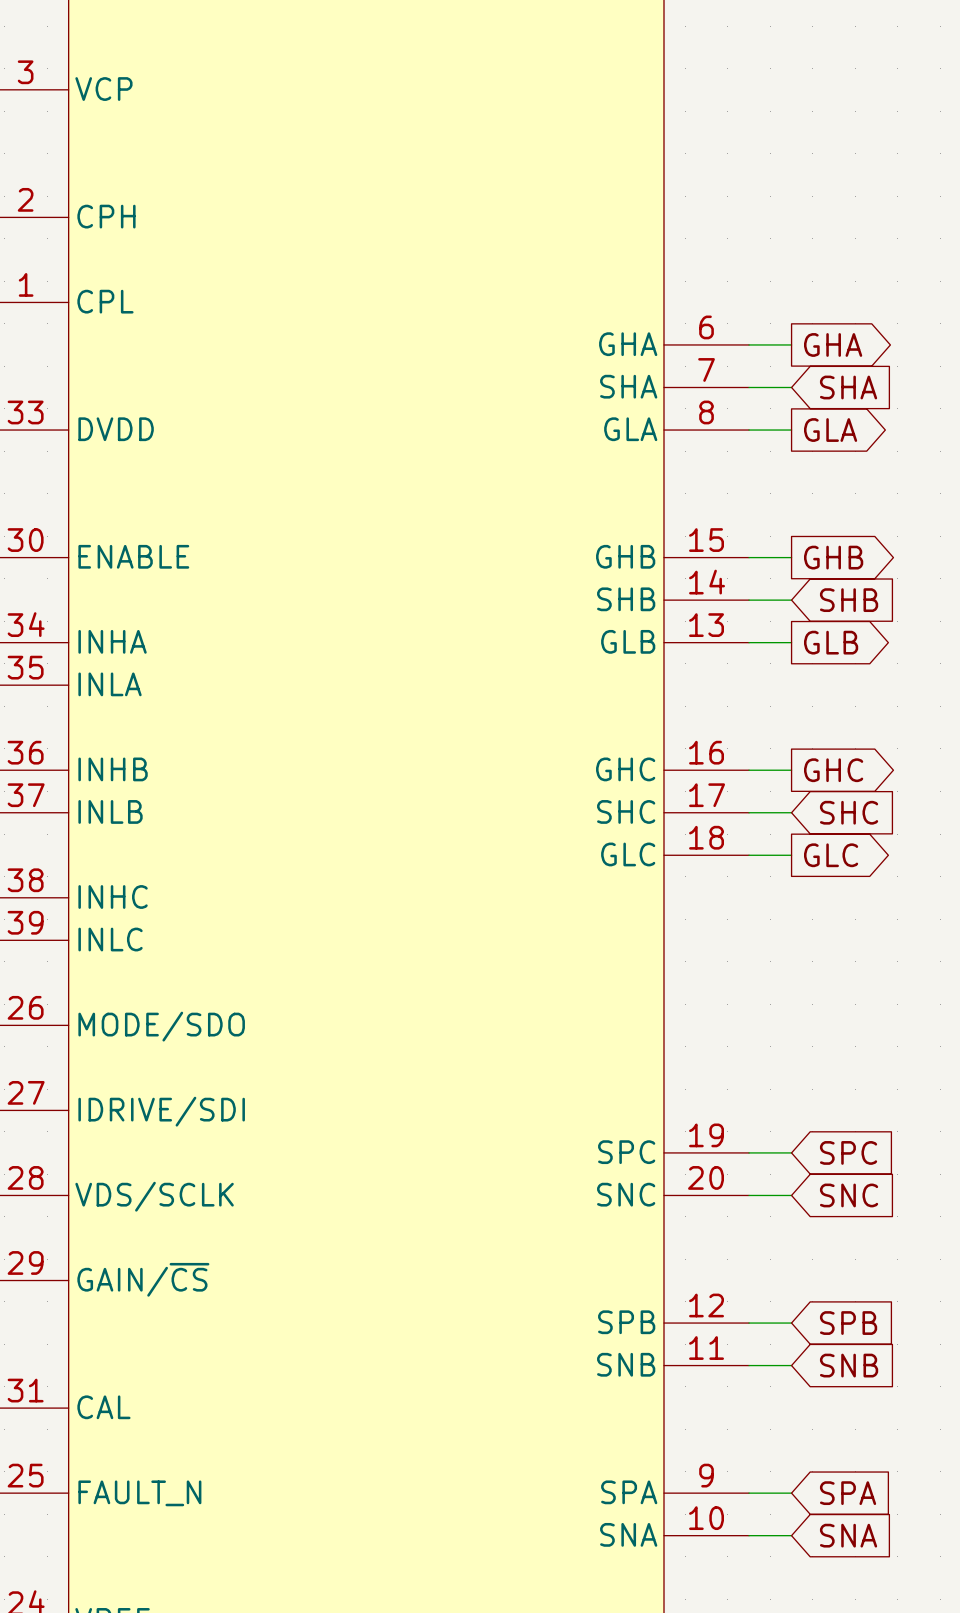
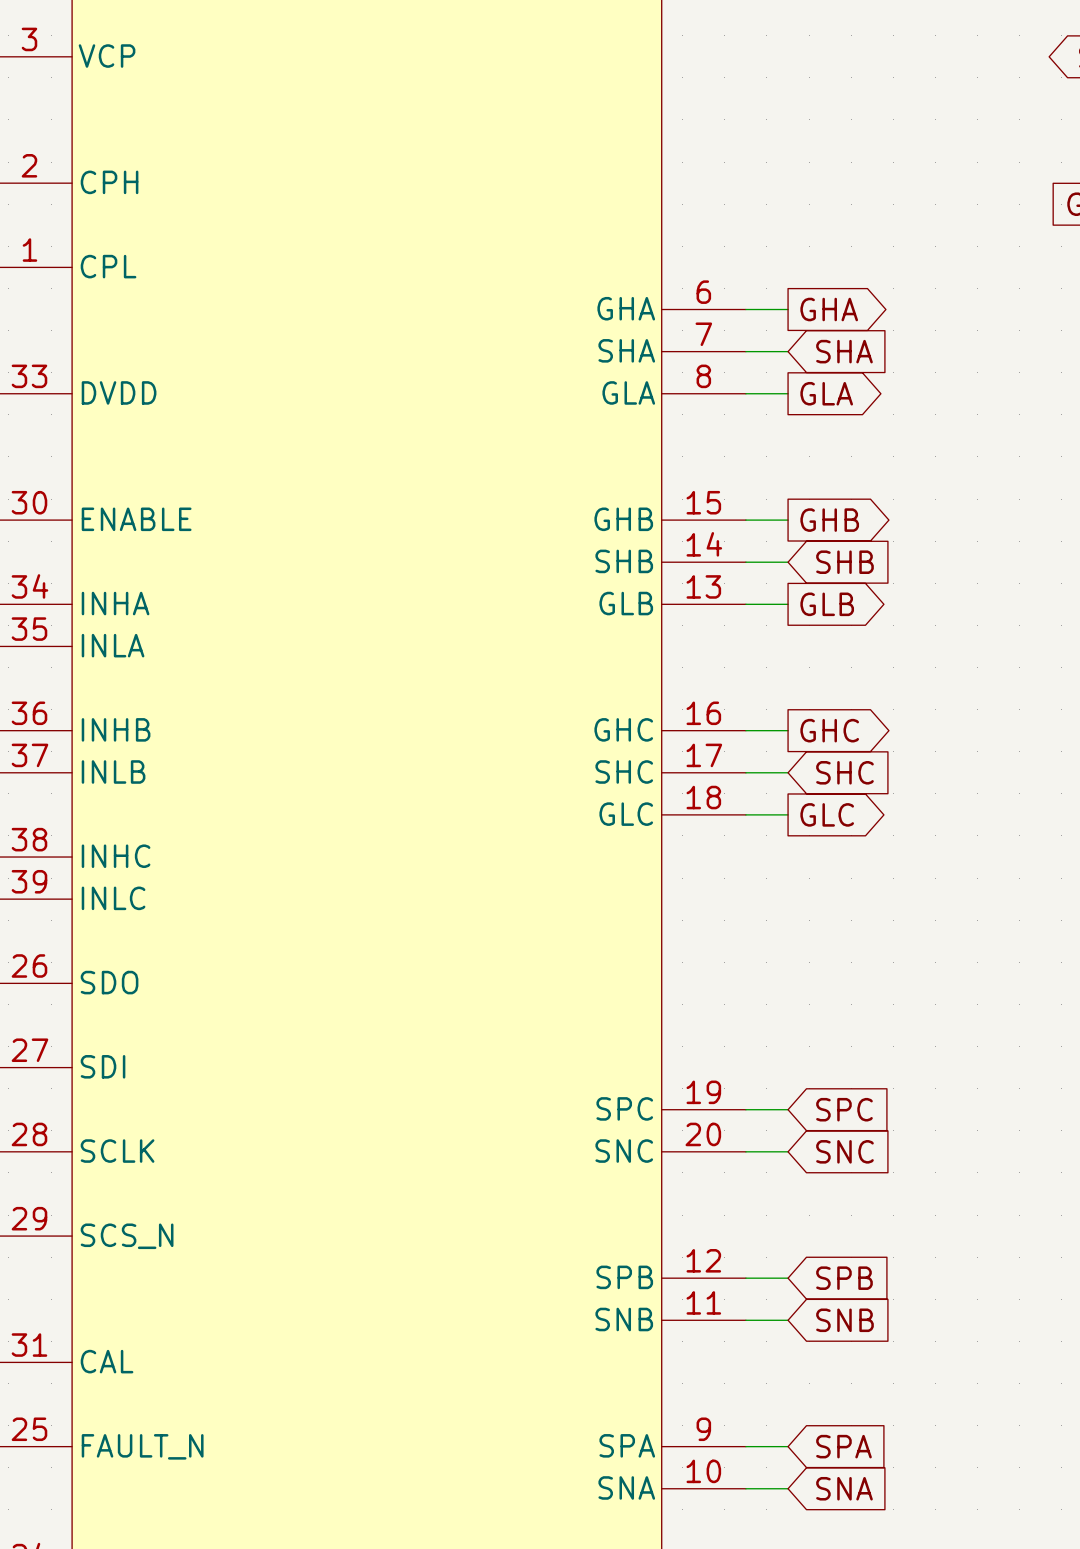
part pin name: MODE/SDO (161, 1026) -> SDO (109, 982)
part pin name: IDRIVE/SDI (161, 1111) -> SDI (103, 1066)
part pin name: VDS/SCLK (154, 1196) -> SCLK (117, 1151)
part pin name: GAIN/~{CS} (143, 1279) -> SCS_N (127, 1236)

